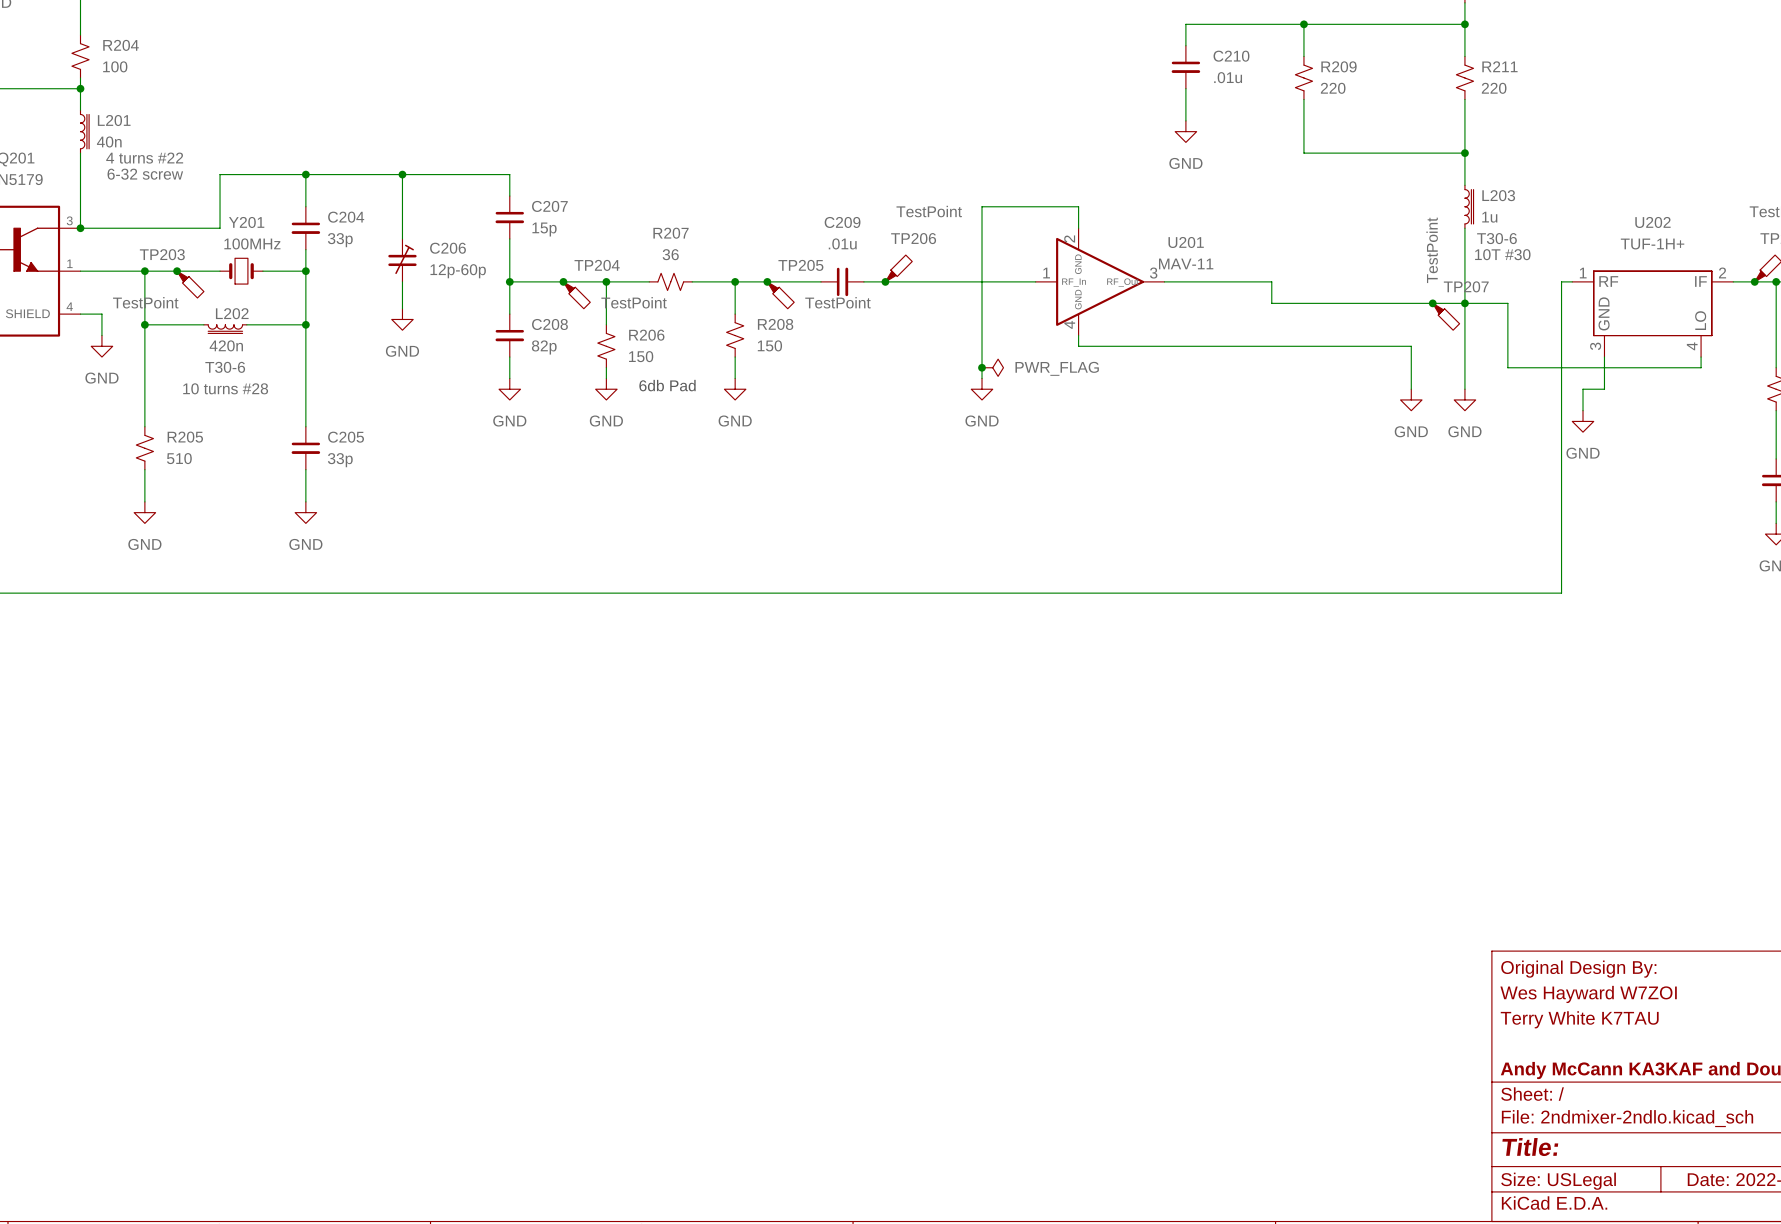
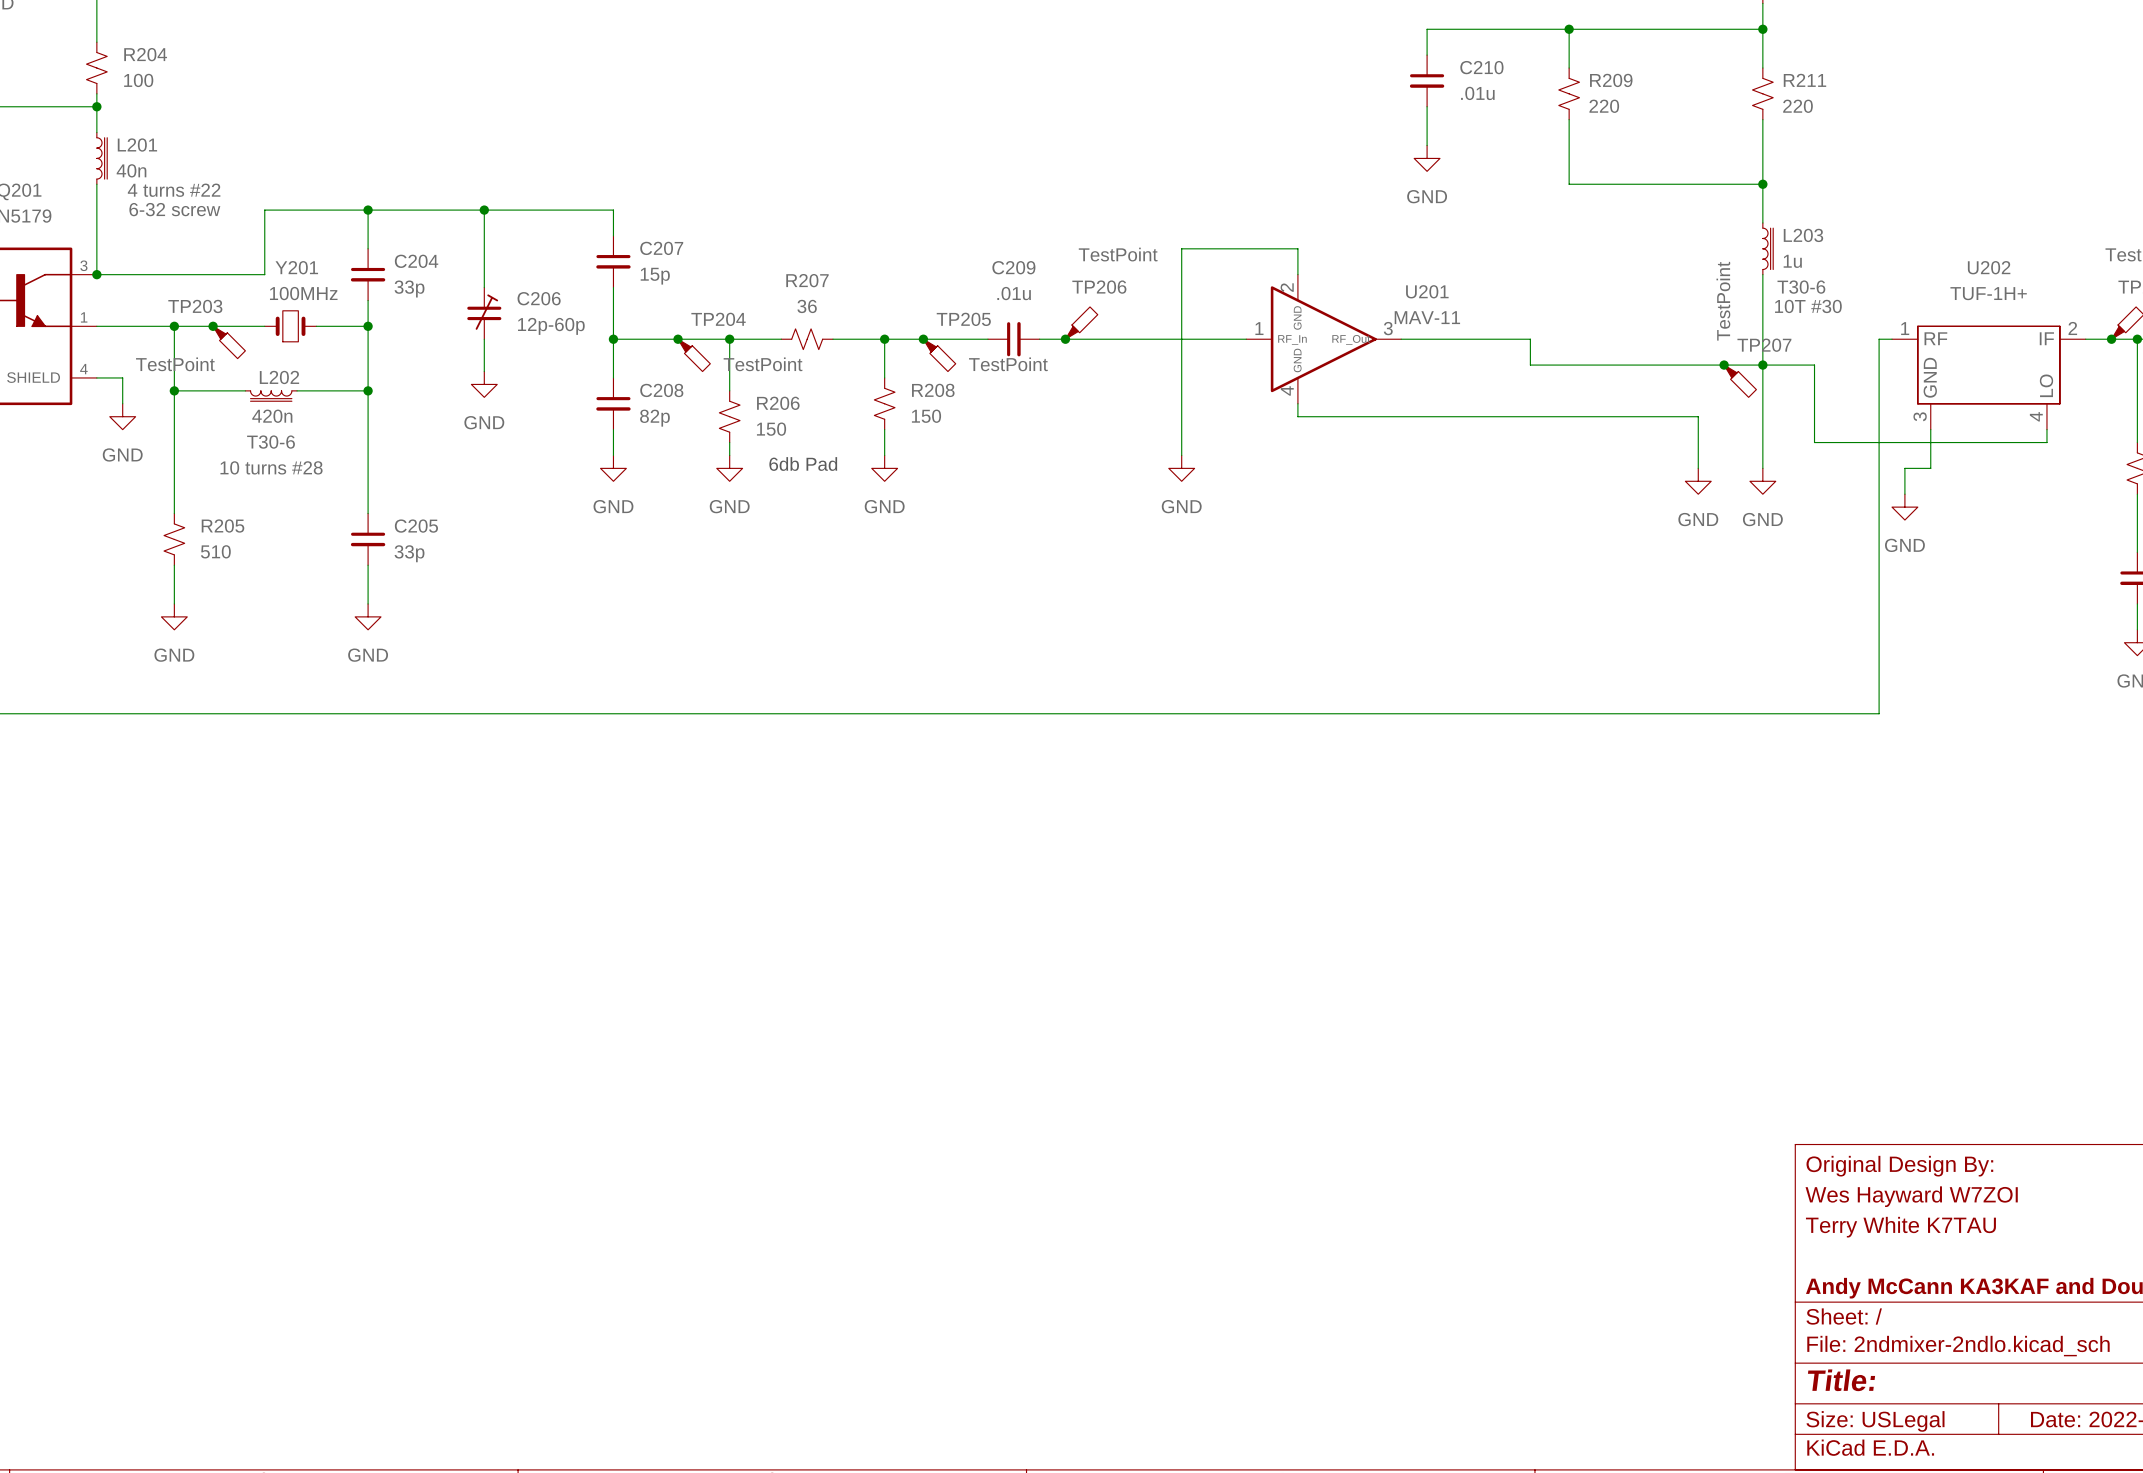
junction: (982, 367) -> none
power symbol: PWR_FLAG (992, 367) -> none

